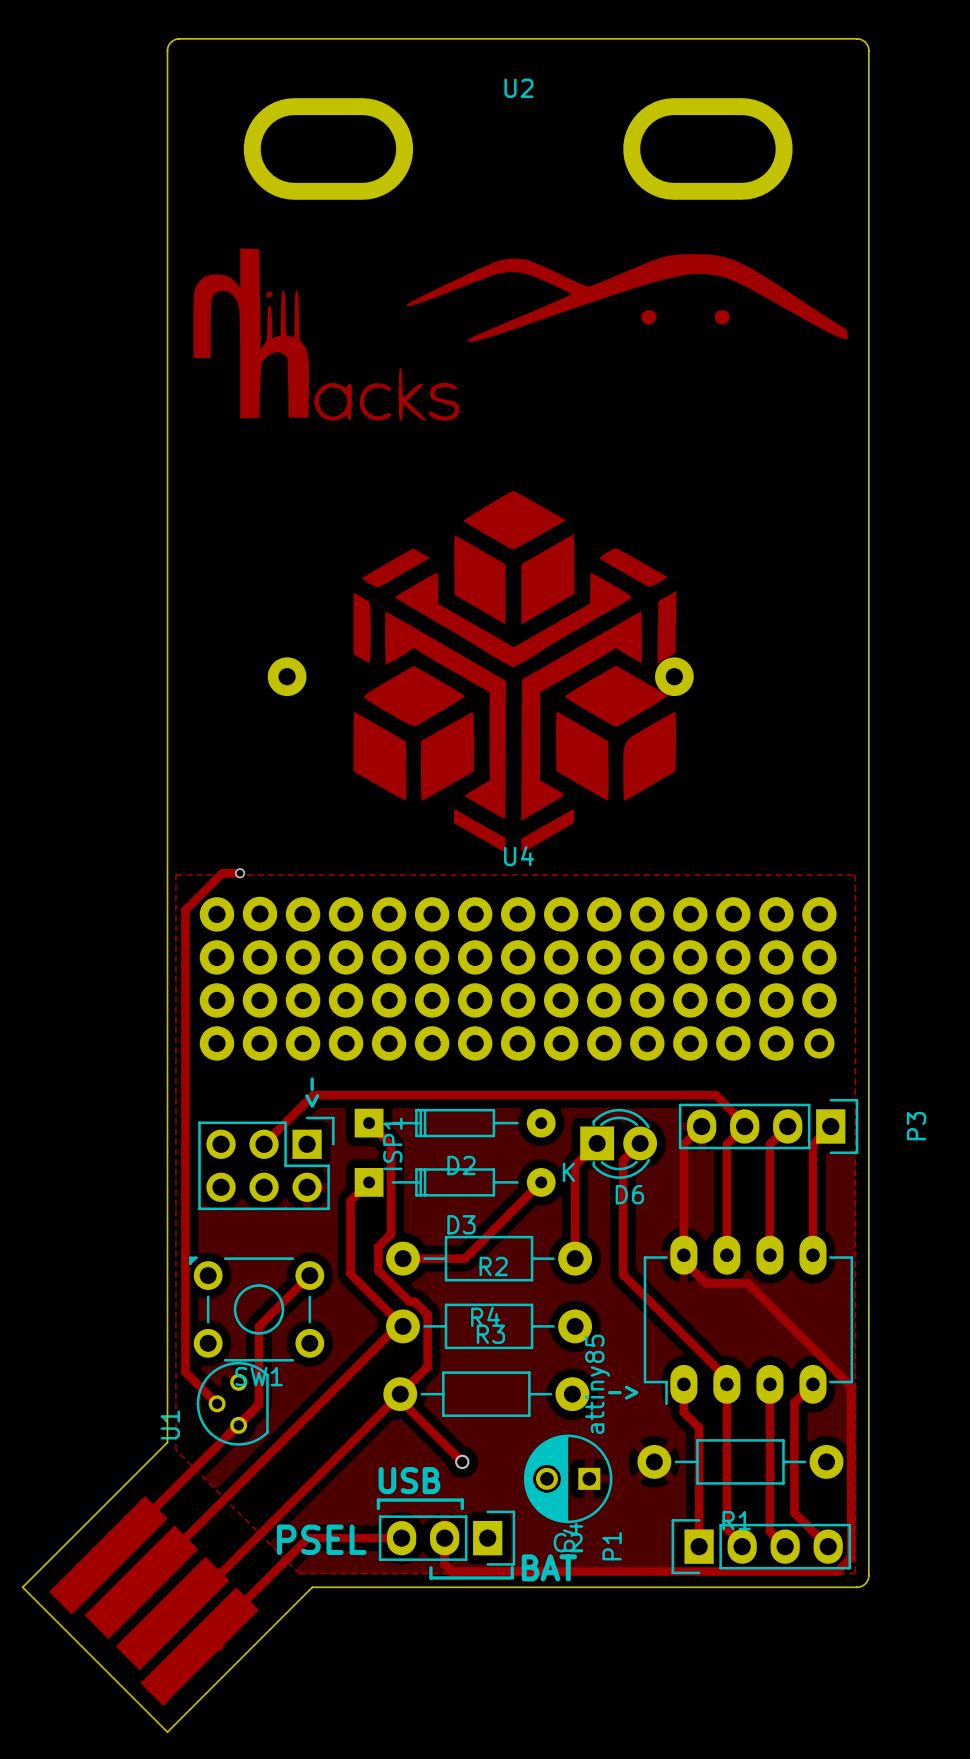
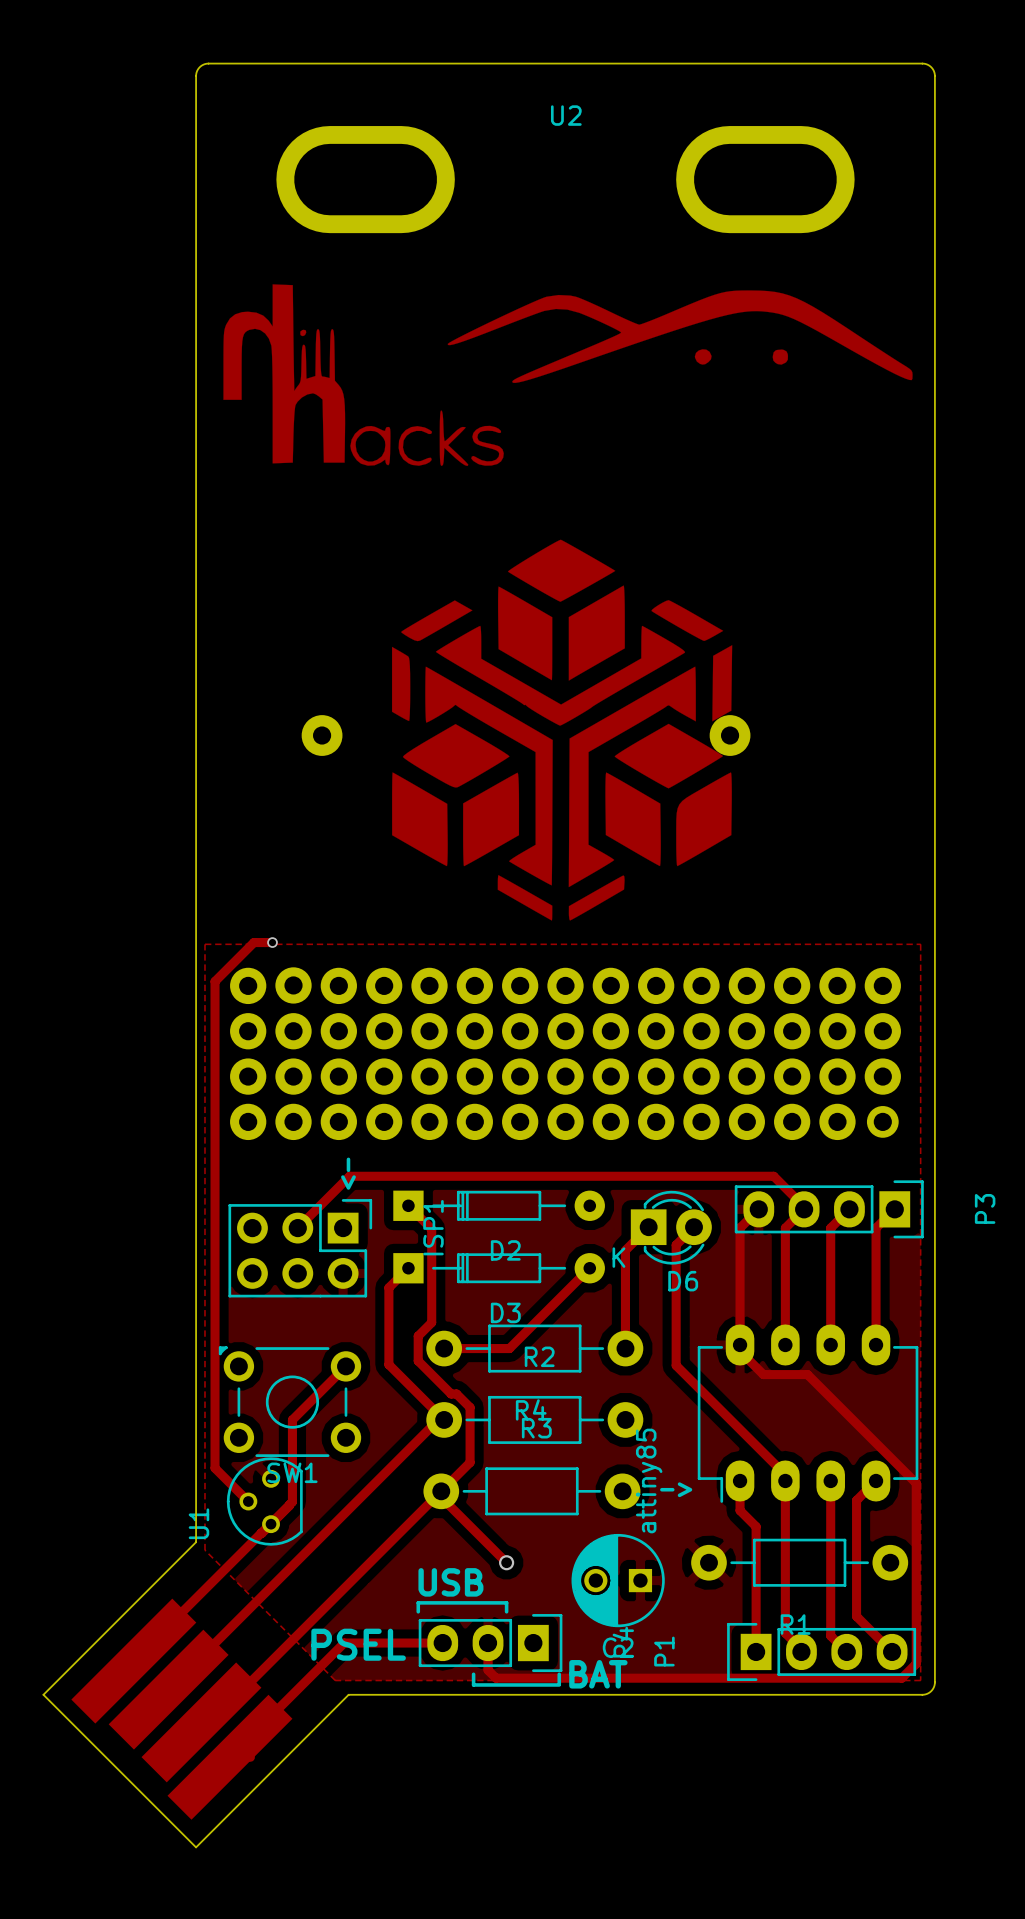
U4 name: U4 (518, 856) -> none

